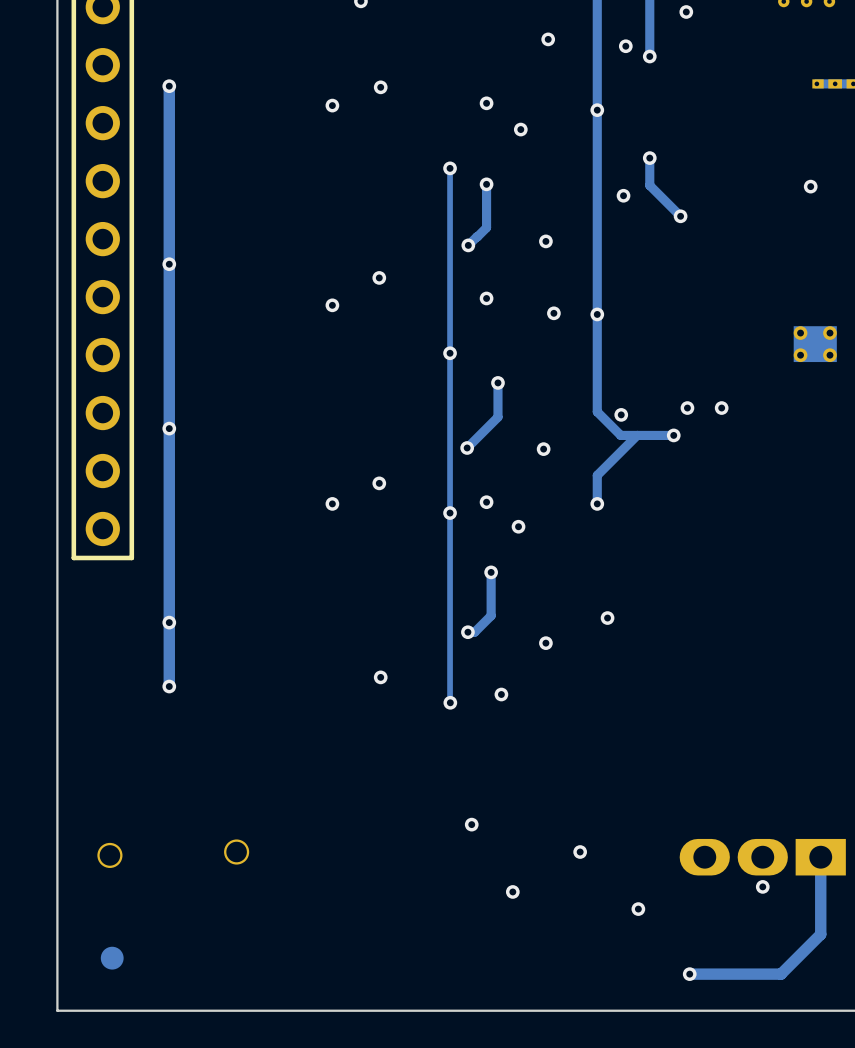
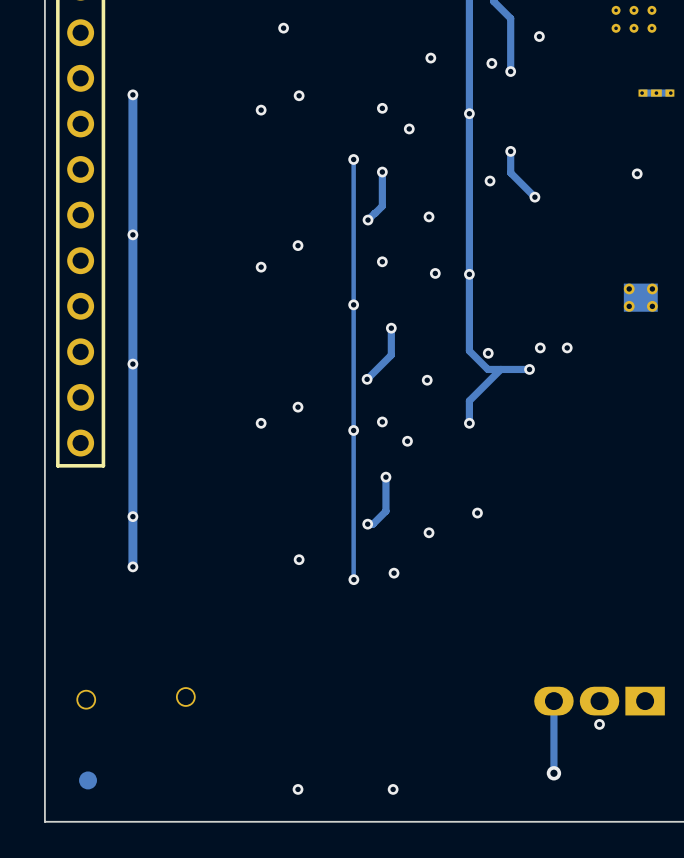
via: (471, 824) -> none
via: (580, 852) -> none
track: none -> (553, 701) (553, 773)
track: (820, 857) (820, 934) (781, 974) (689, 974) -> none
via: (512, 891) -> none
via: (638, 909) -> none
via: none -> (553, 773)
via: none -> (298, 789)
via: none -> (393, 789)
via: (689, 974) -> none

